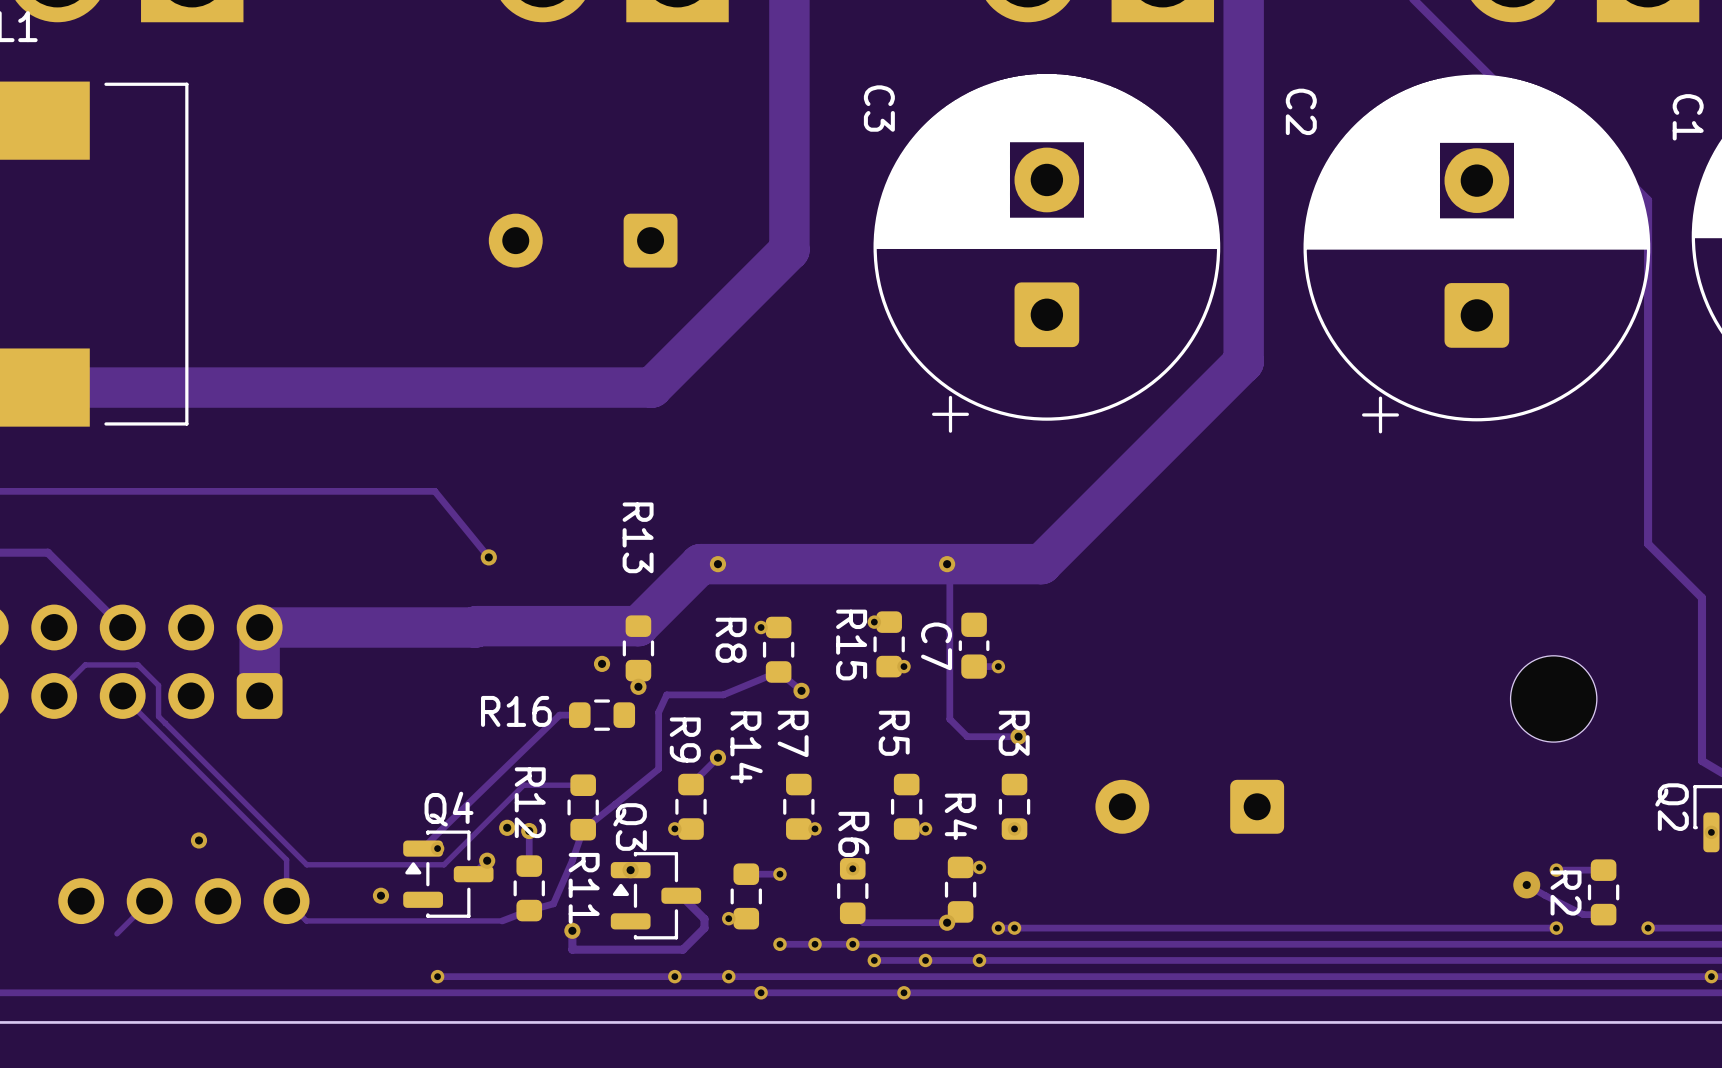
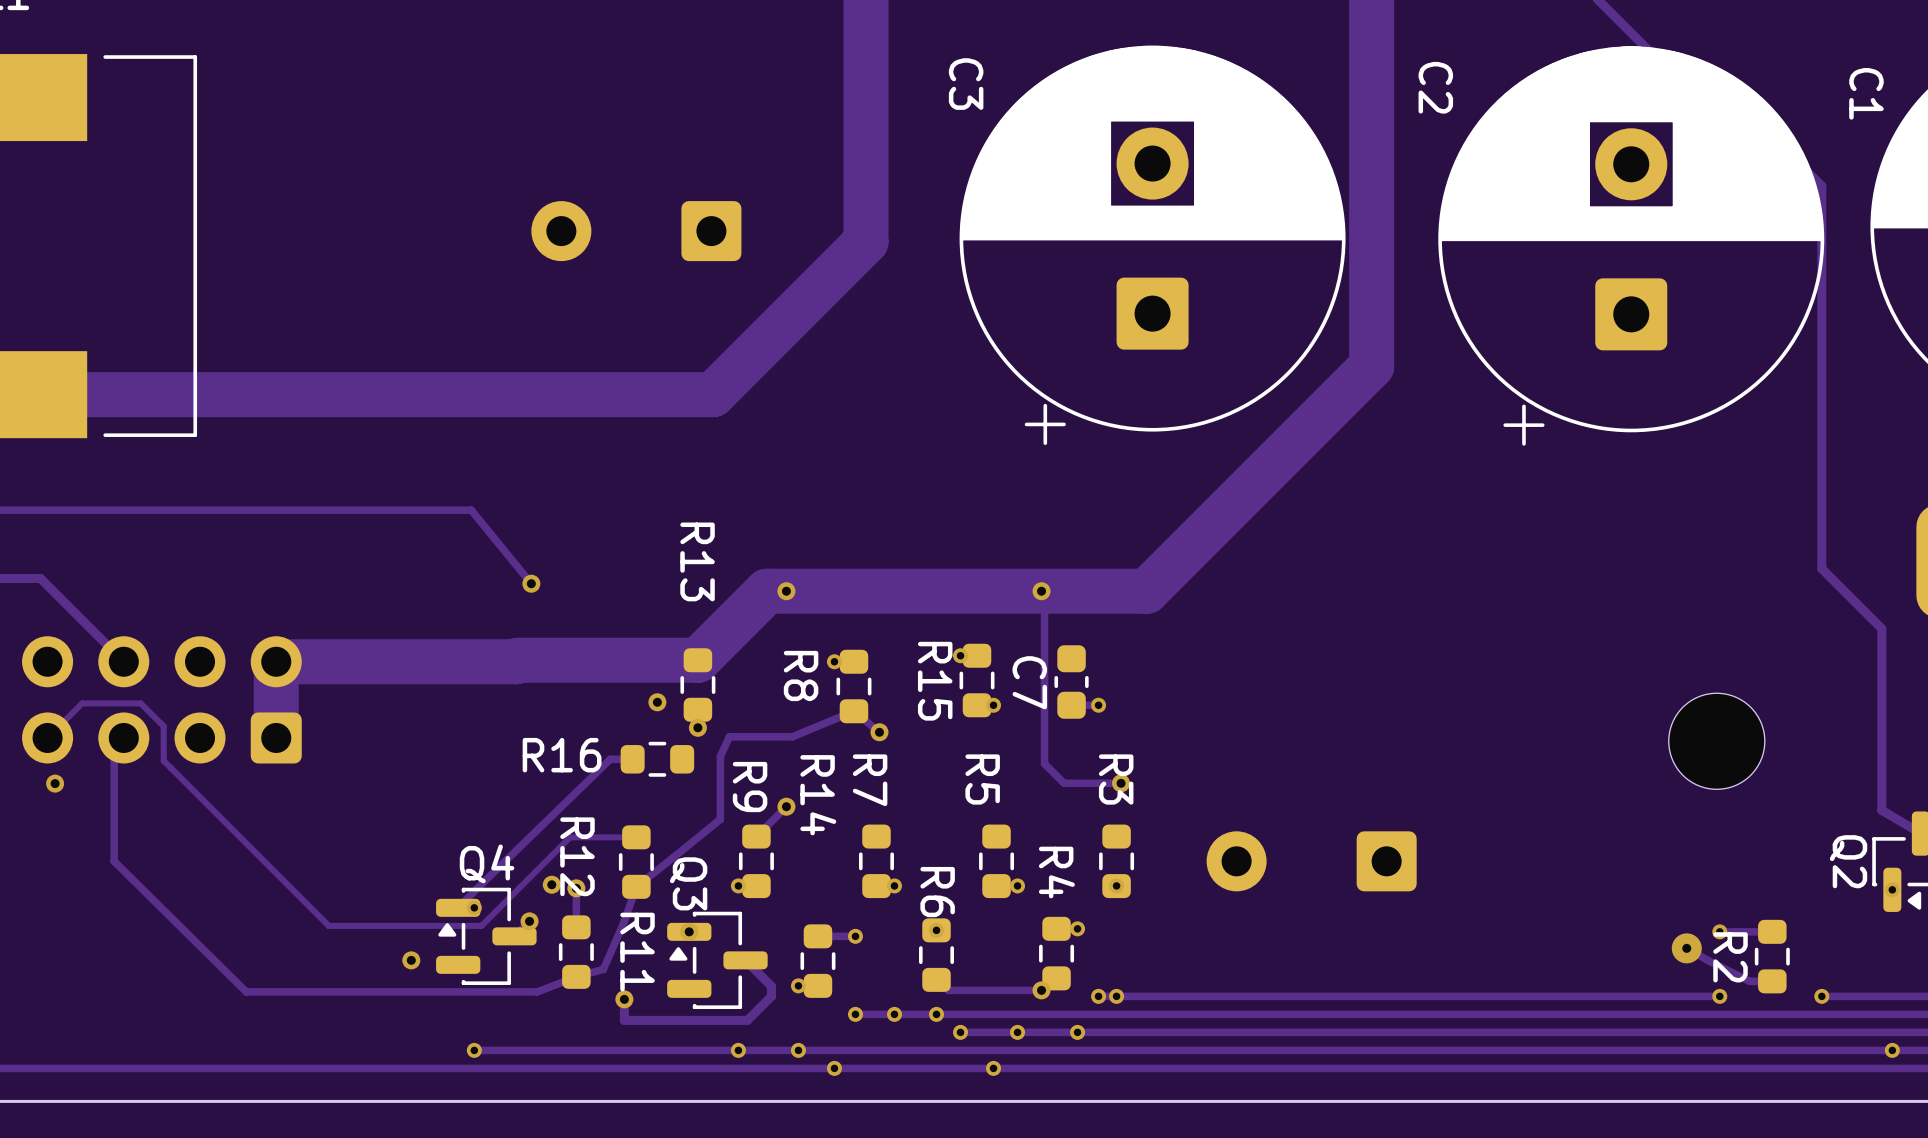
track: (122, 695) (286, 859) (286, 901) (306, 920) (502, 920) -> (114, 753) (114, 861) (246, 991) (537, 991) (546, 988)
via: none -> (55, 783)
via: (198, 840) -> none
track: (149, 901) (116, 933) -> none
part: (183, 901) -> none

